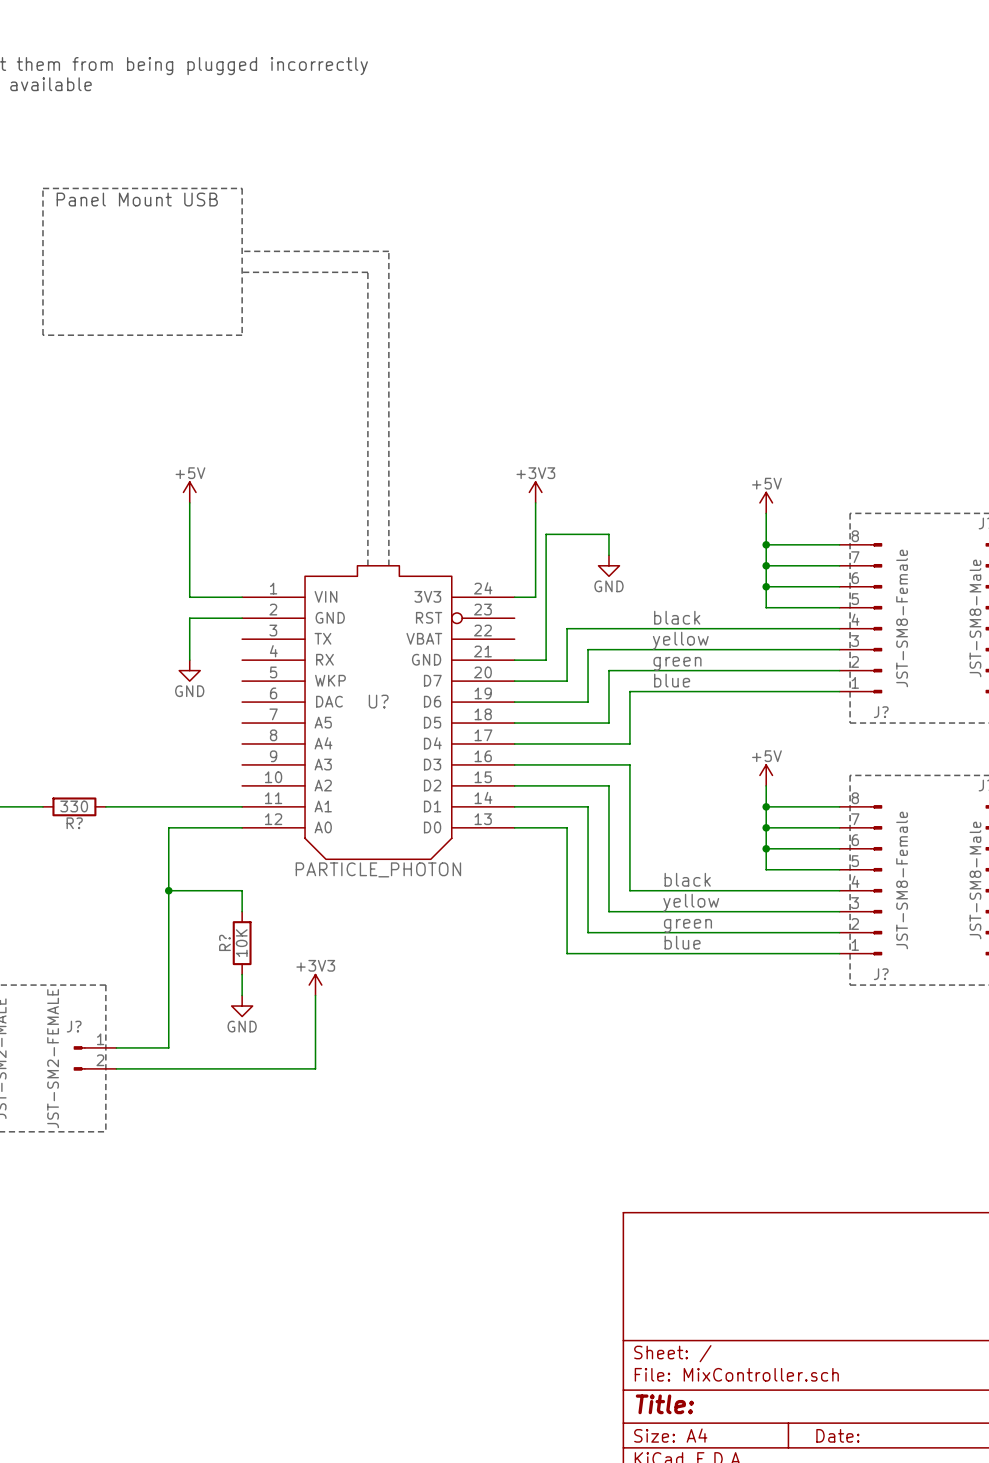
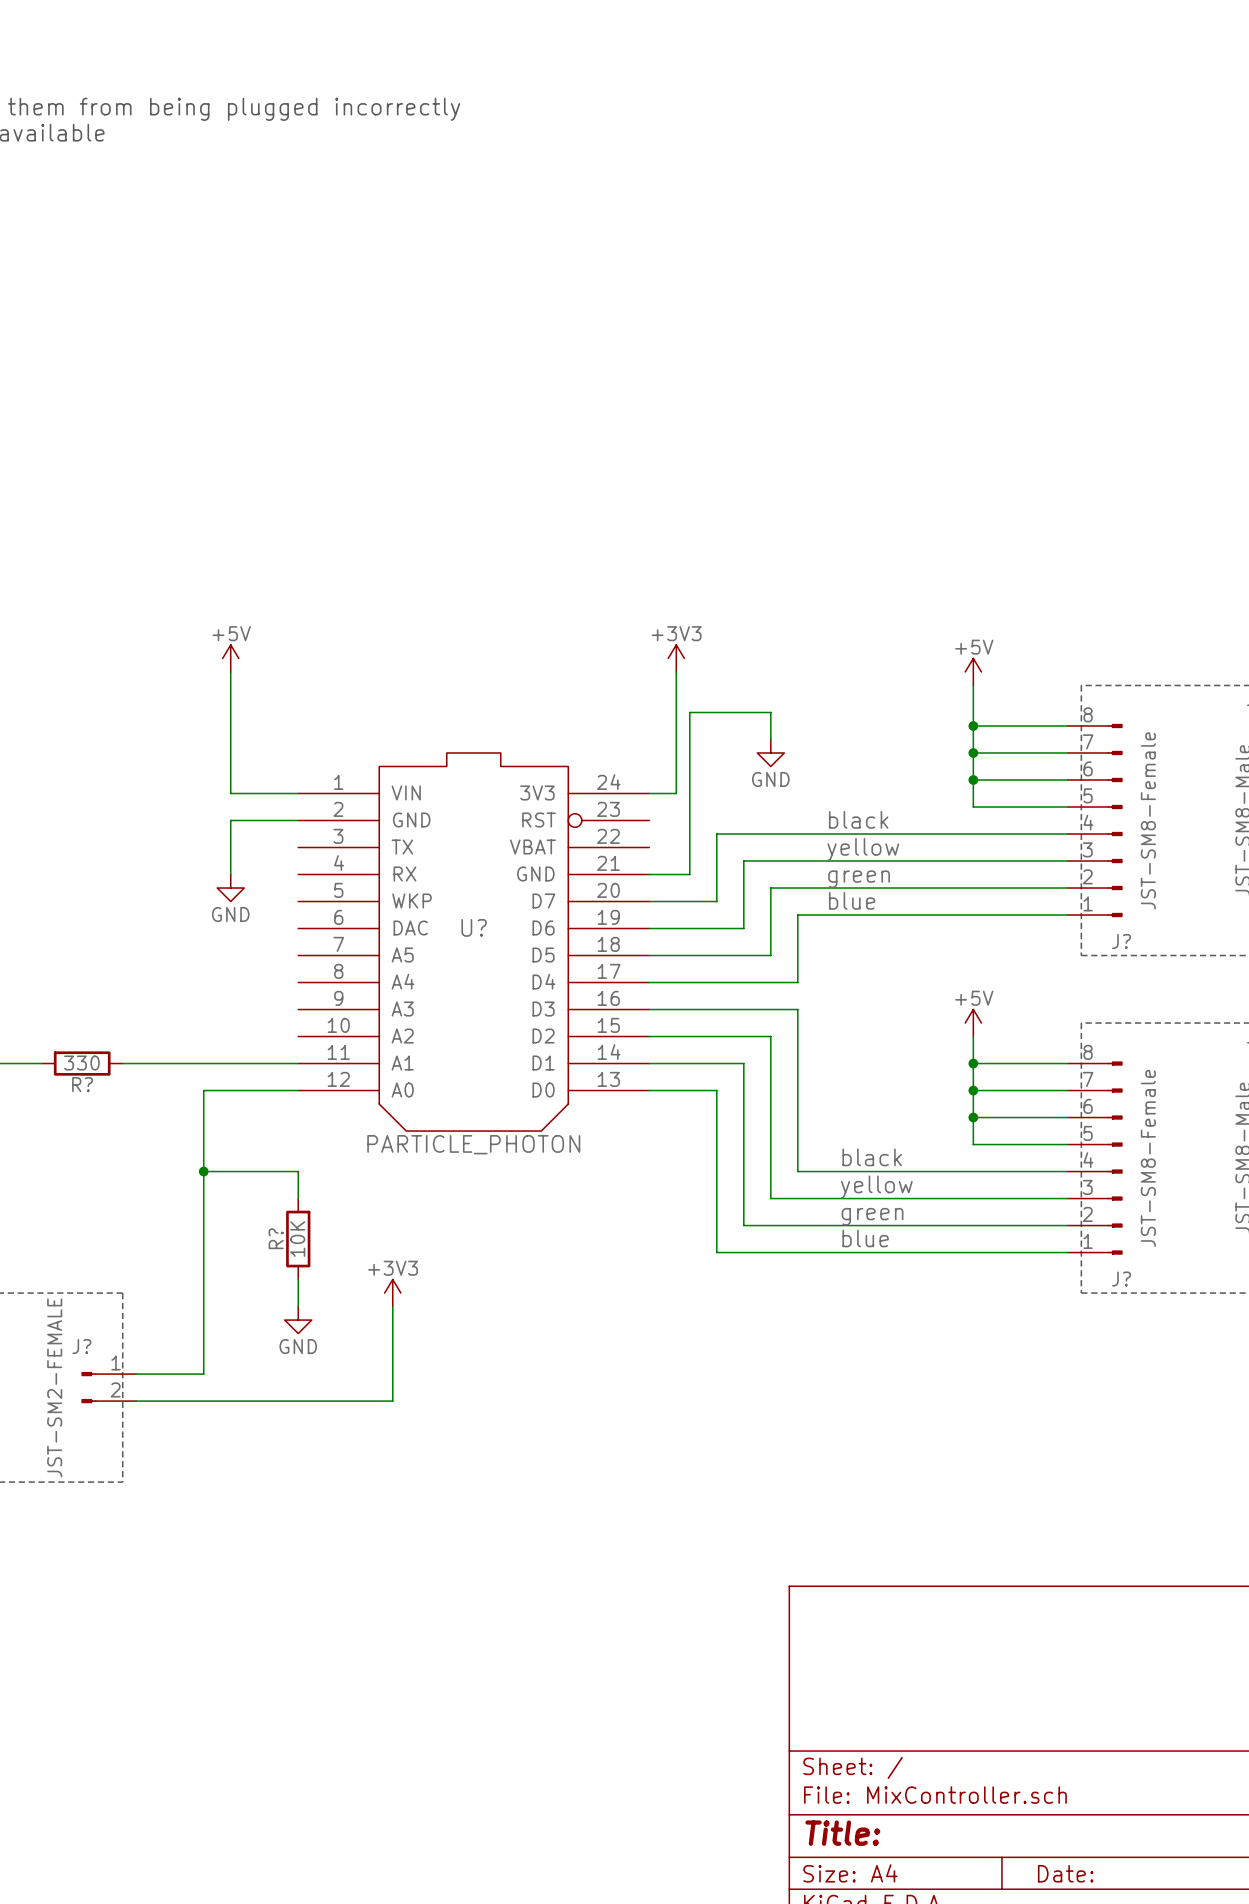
line: (42, 188) (242, 188) (242, 335) (42, 335) (42, 188) -> none
text: Panel Mount USB (137, 199) -> none
line: (242, 251) (388, 251) (388, 565) -> none
line: (242, 272) (367, 272) (367, 565) -> none

